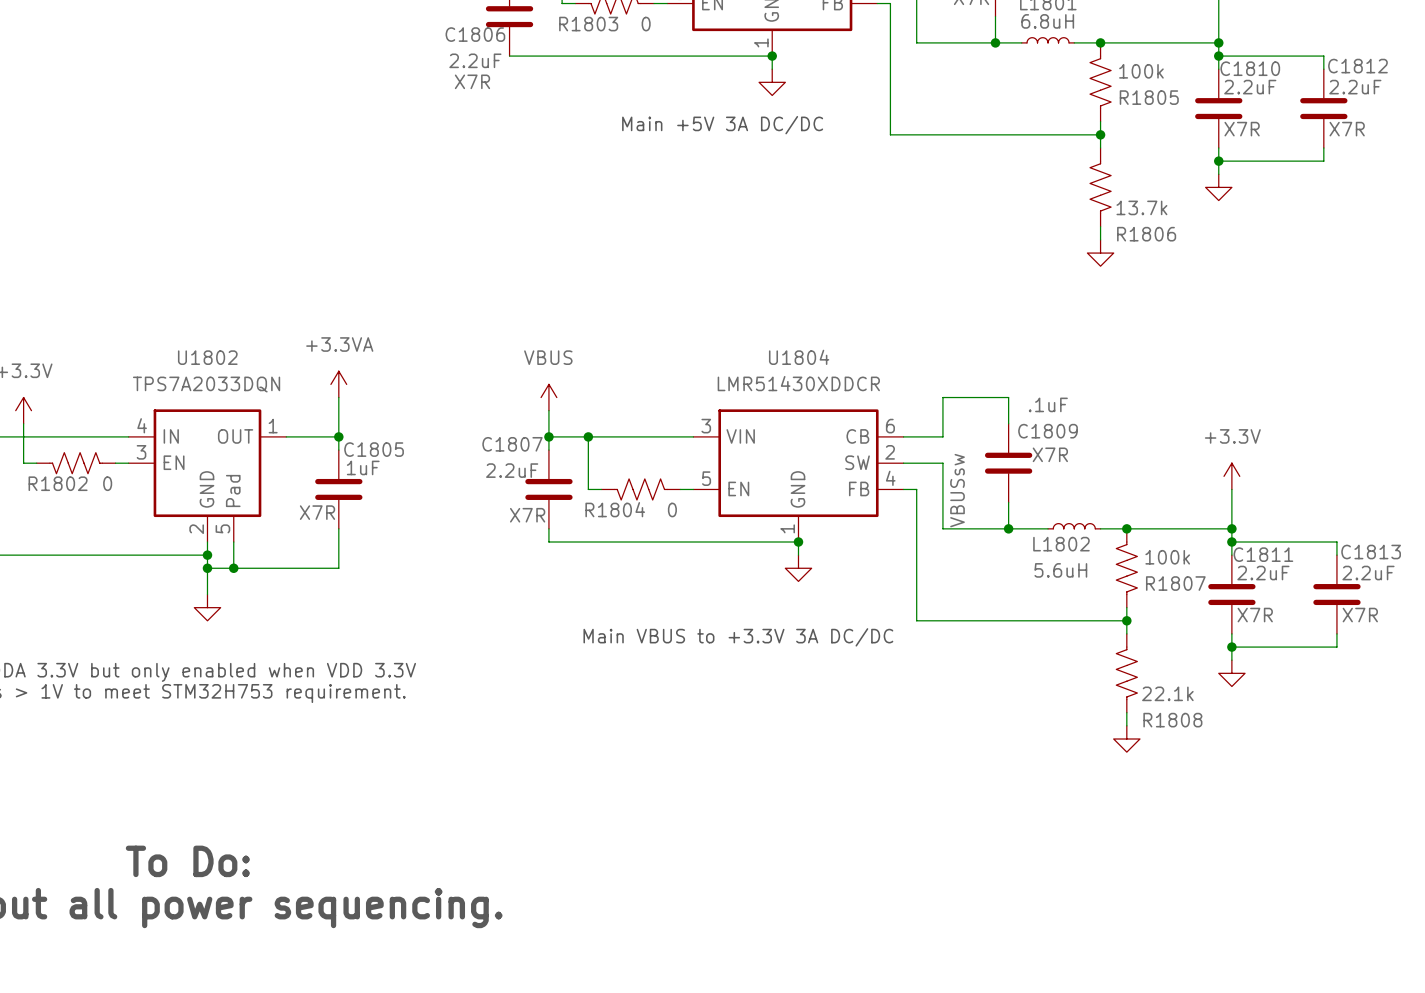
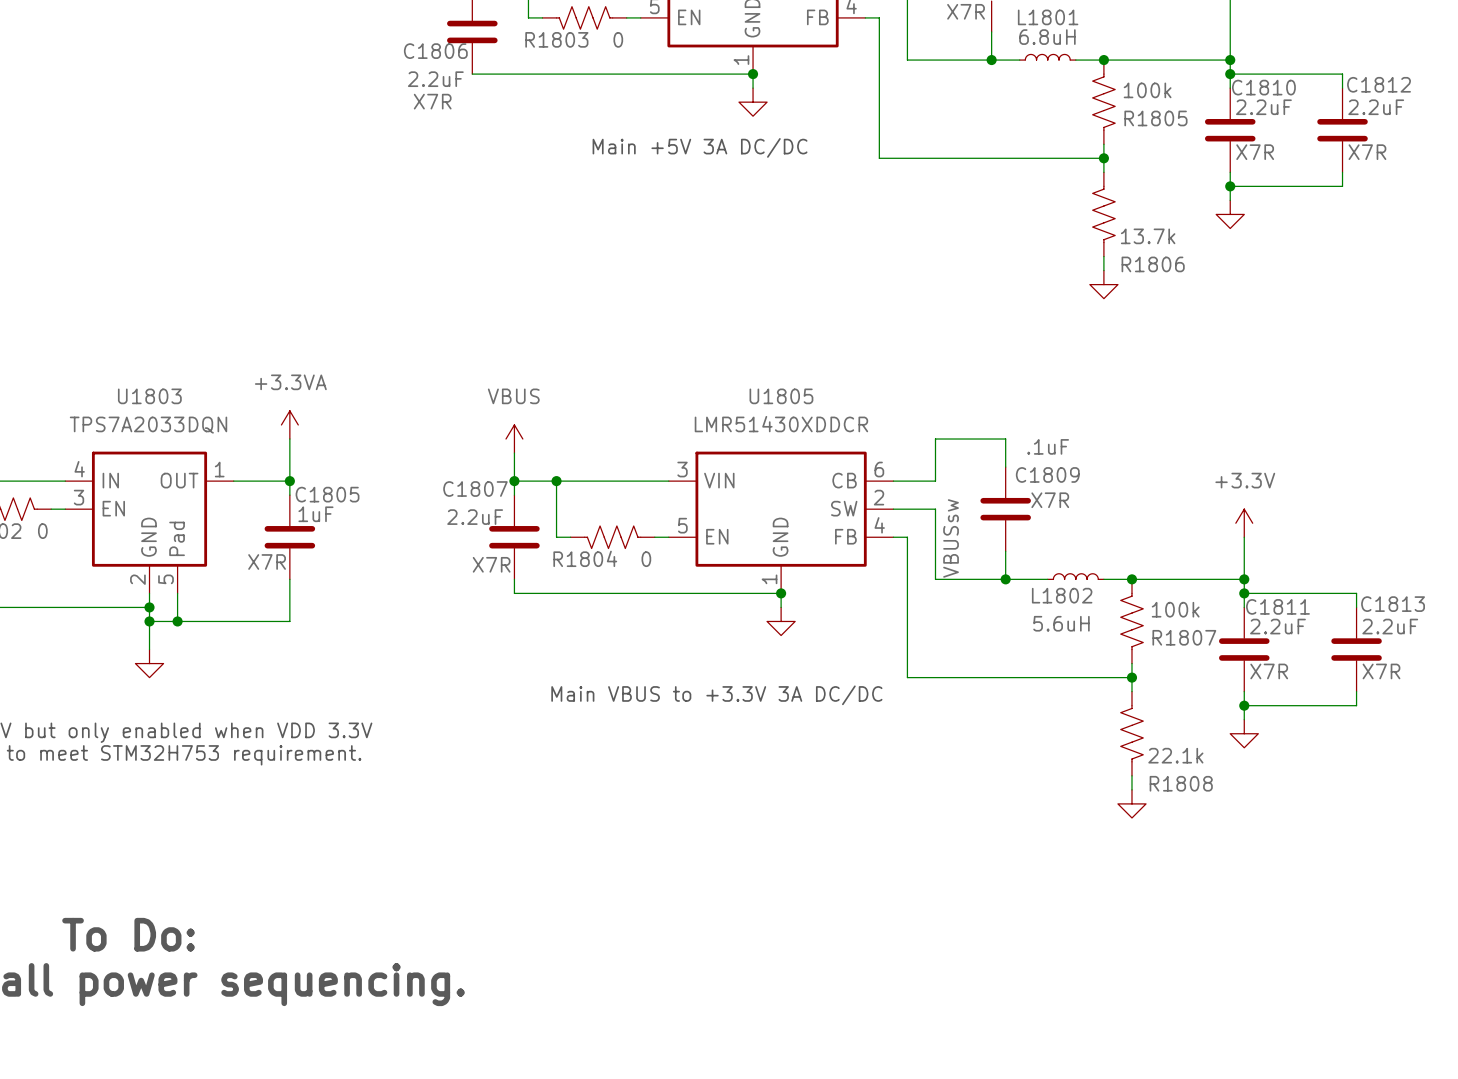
U1802 name: U1802 (207, 357) -> U1803 (149, 396)
U1804 name: U1804 (799, 357) -> U1805 (781, 396)

